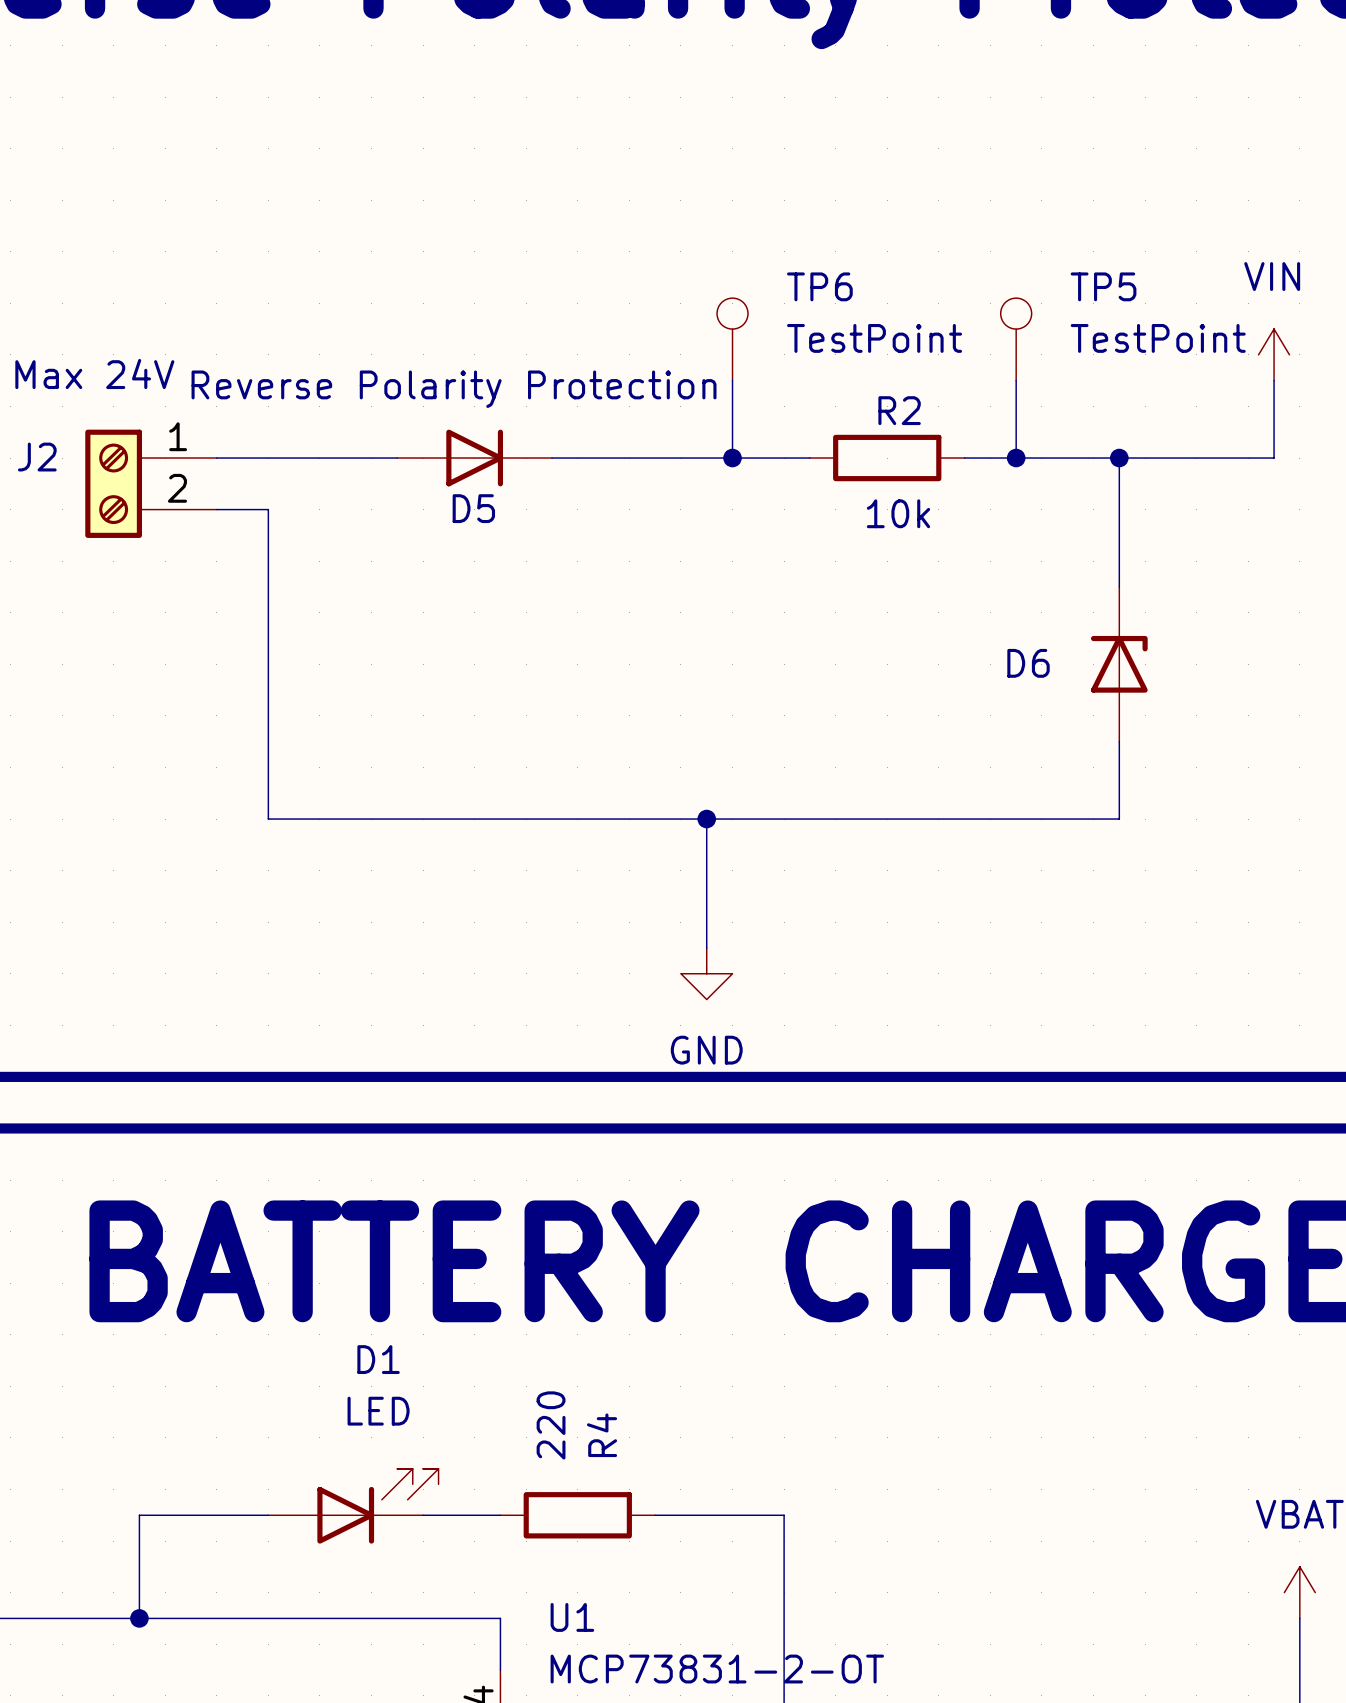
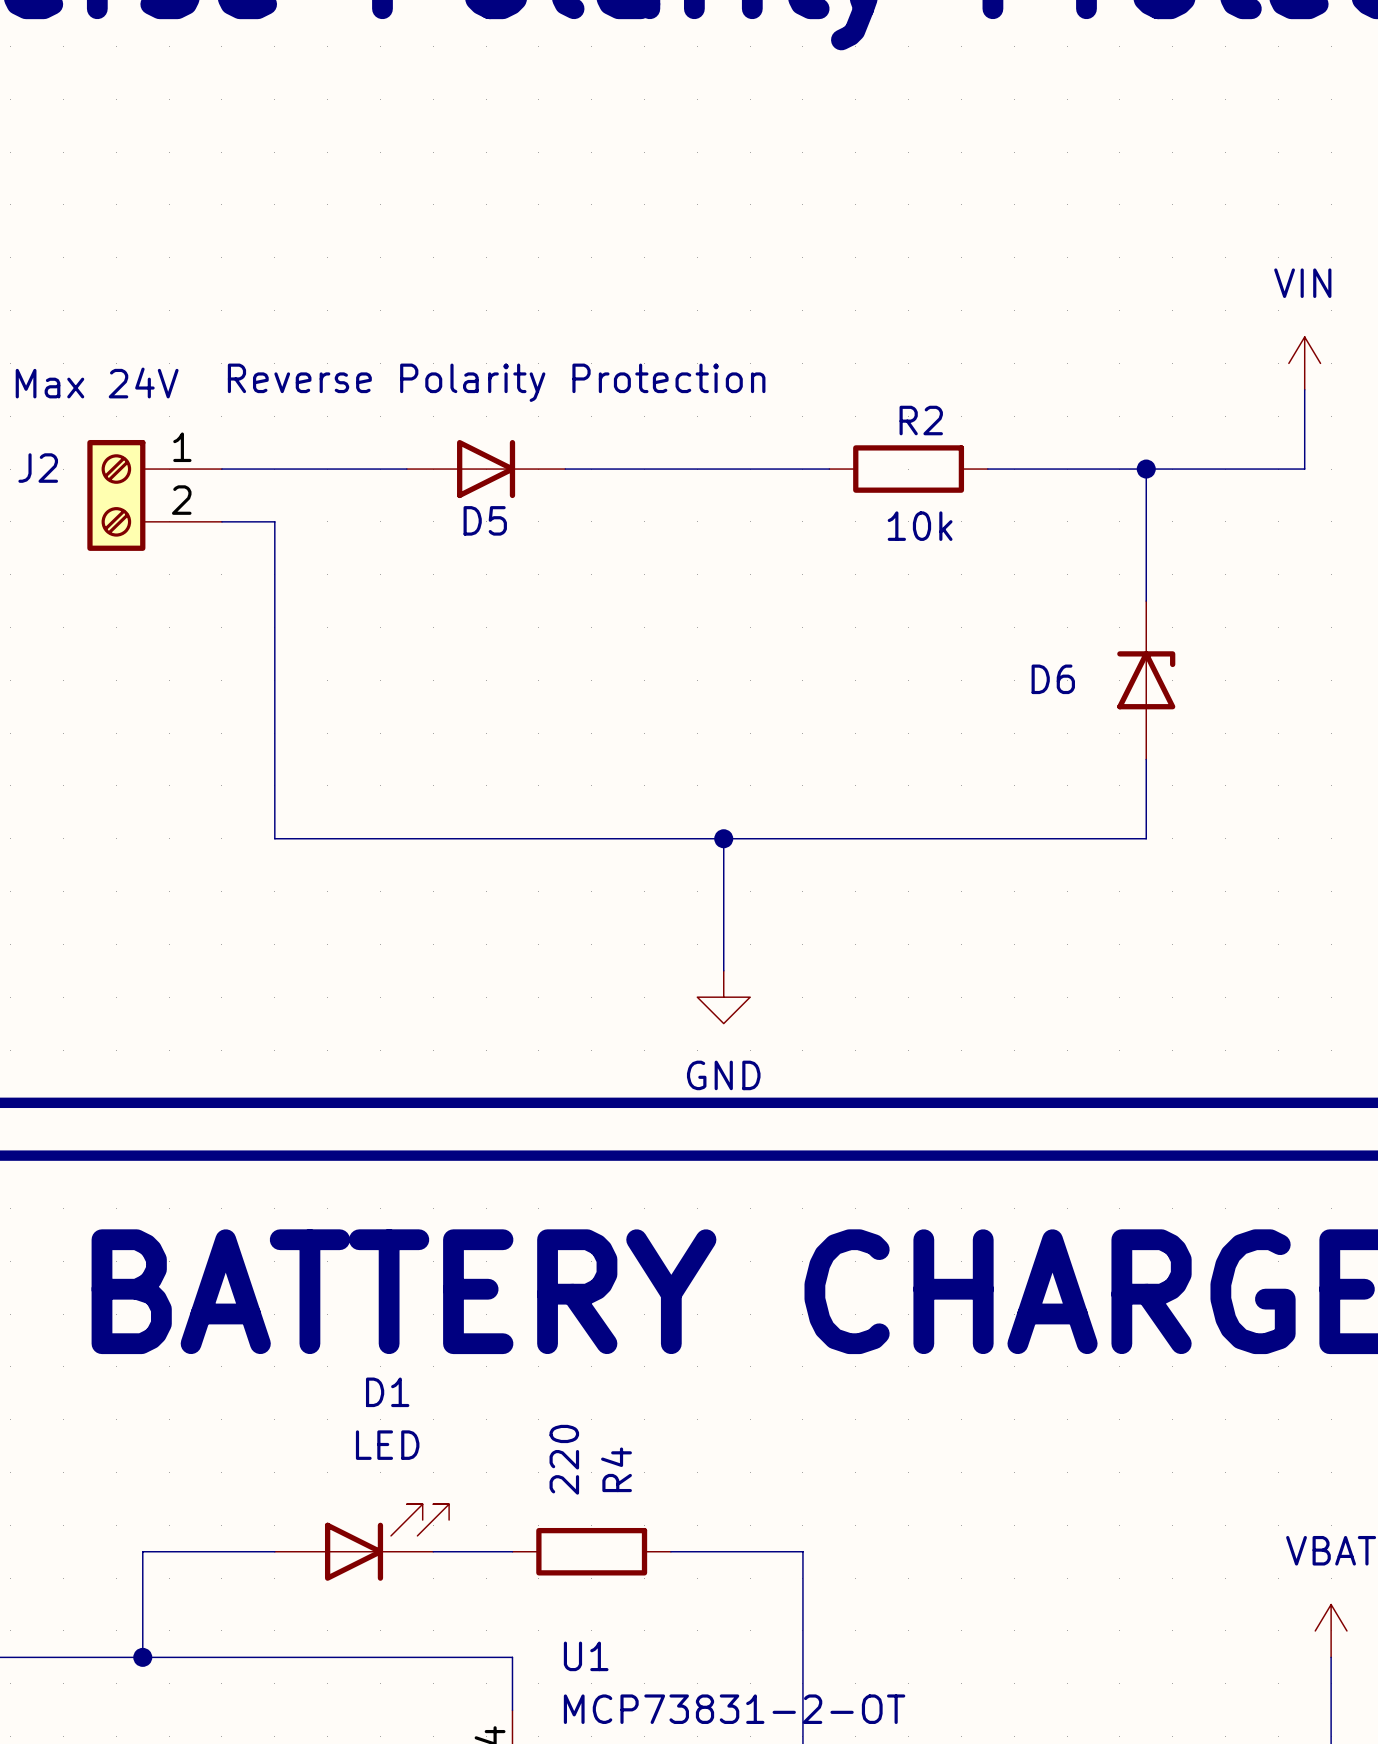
TP6: TestPoint (732, 339) -> none
TP5: TestPoint (1016, 339) -> none
wire: (732, 380) (732, 458) -> none
wire: (1016, 380) (1016, 458) -> none
text position: Reverse Polarity Protection (454, 389) -> Reverse Polarity Protection (496, 382)
junction: (732, 458) -> none
junction: (1016, 458) -> none

